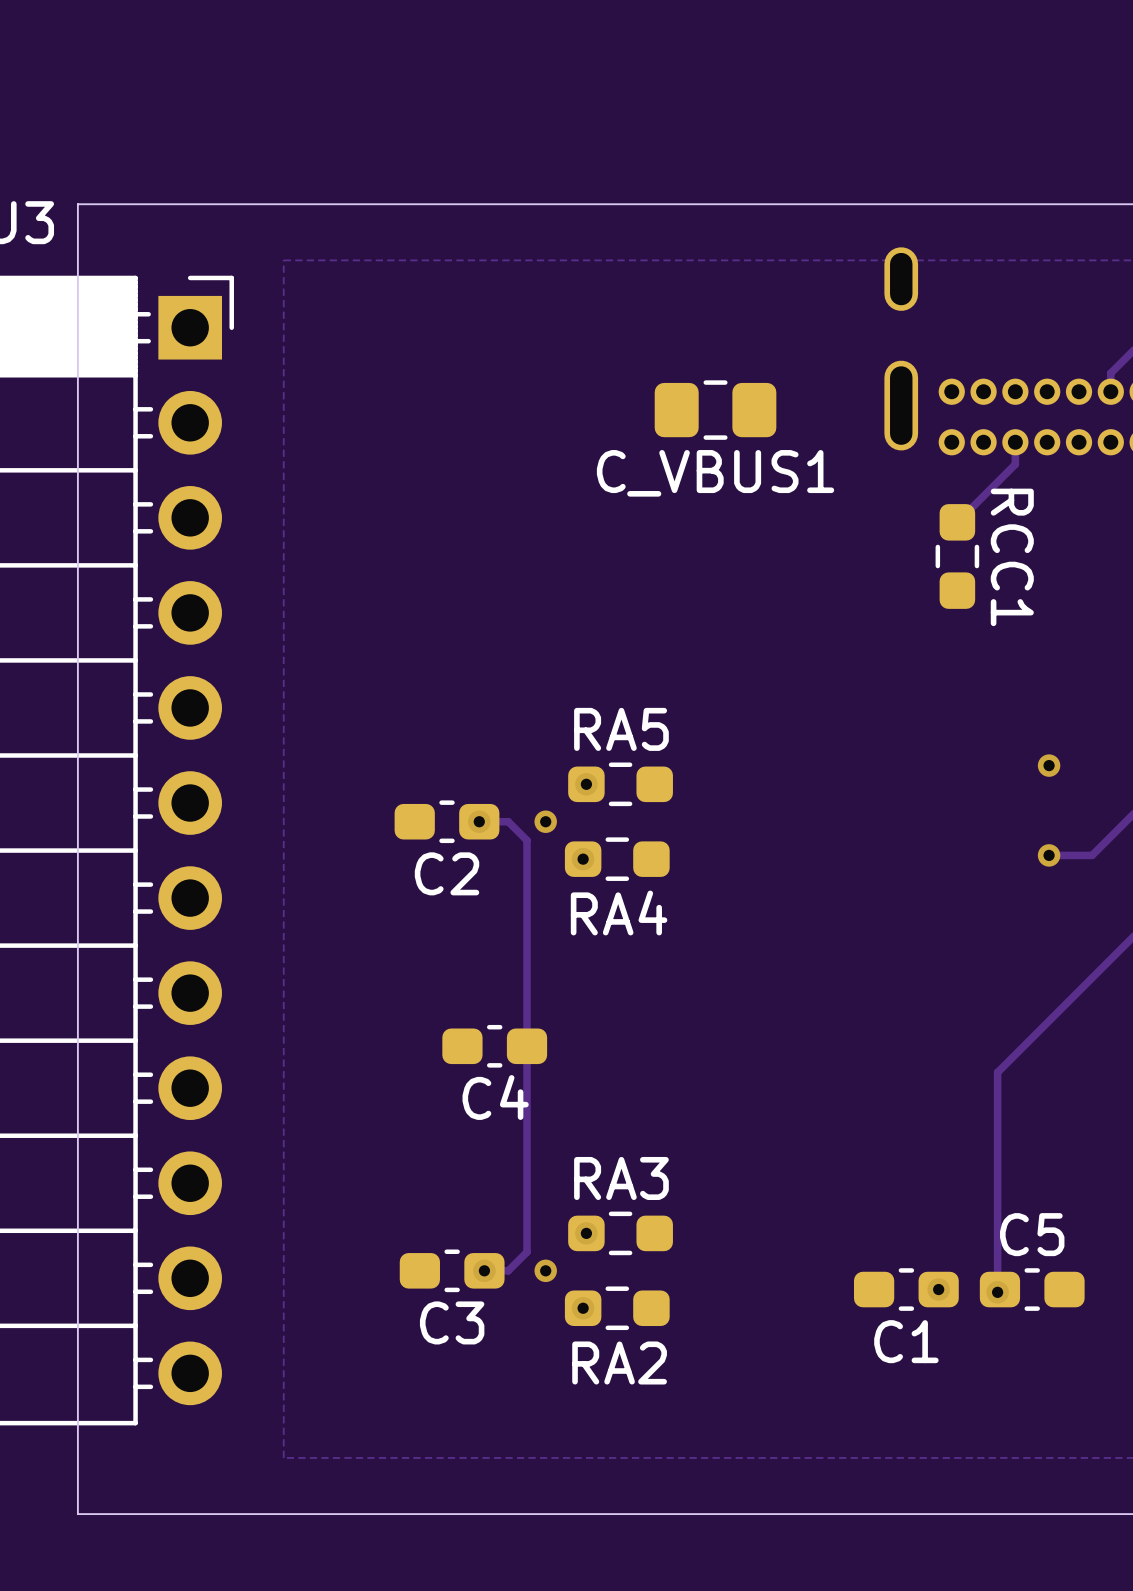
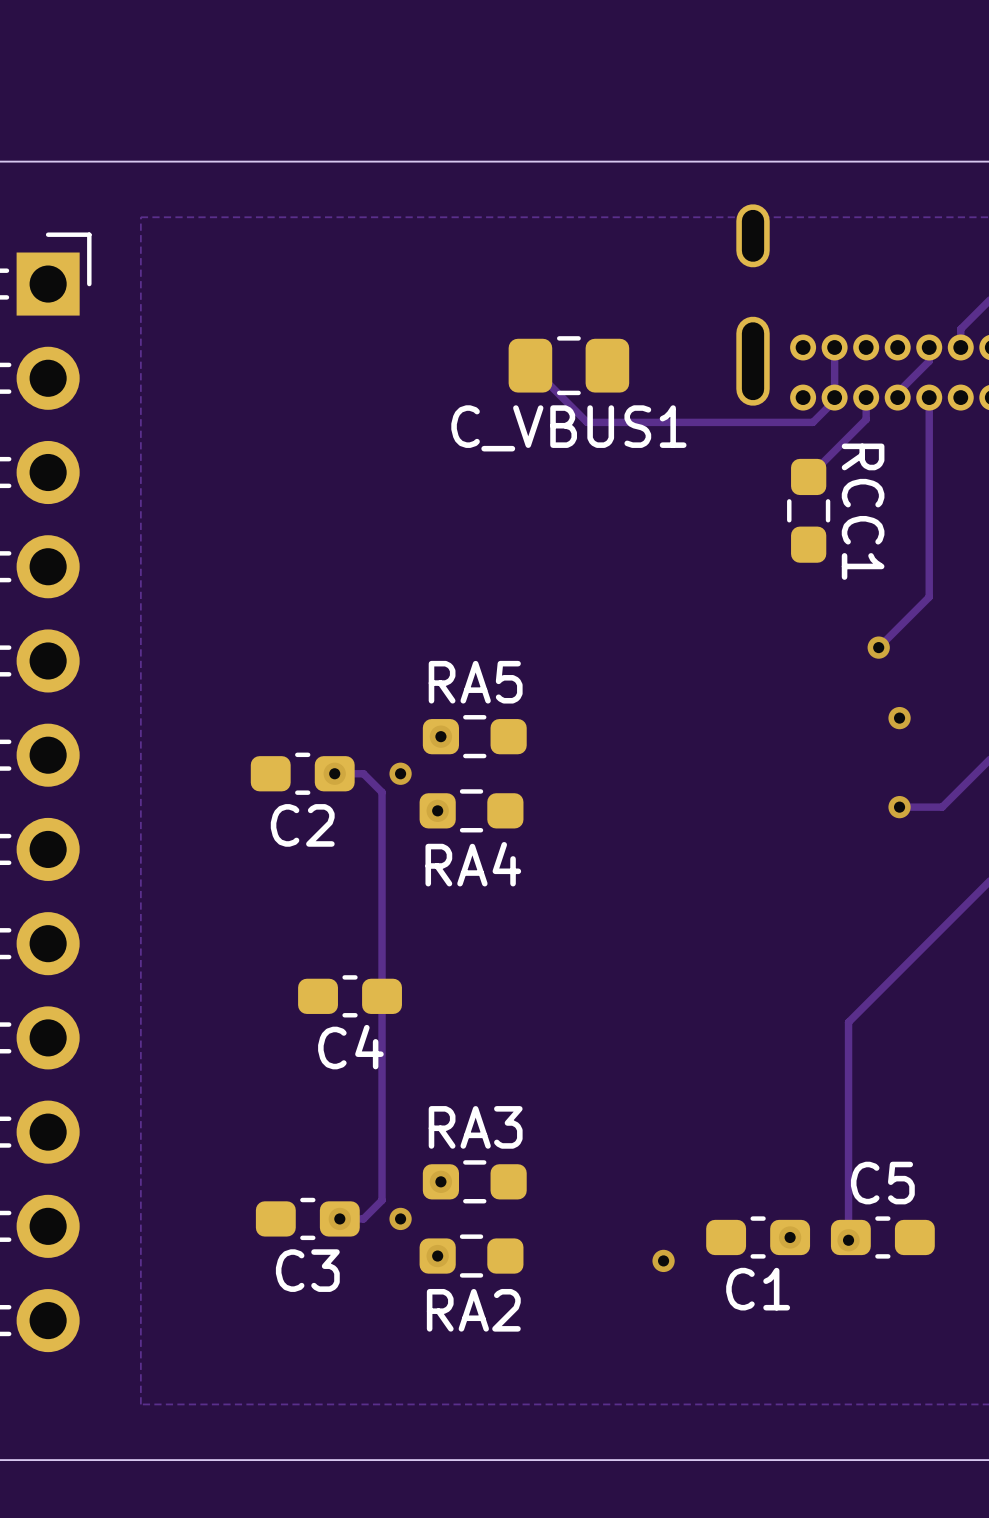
track: none -> (834, 347) (834, 400) (812, 422) (587, 422) (530, 365)
track: none -> (929, 347) (929, 361) (897, 392) (897, 397)
track: none -> (929, 397) (929, 597) (878, 647)
via: none -> (878, 647)
via: none -> (663, 1260)

